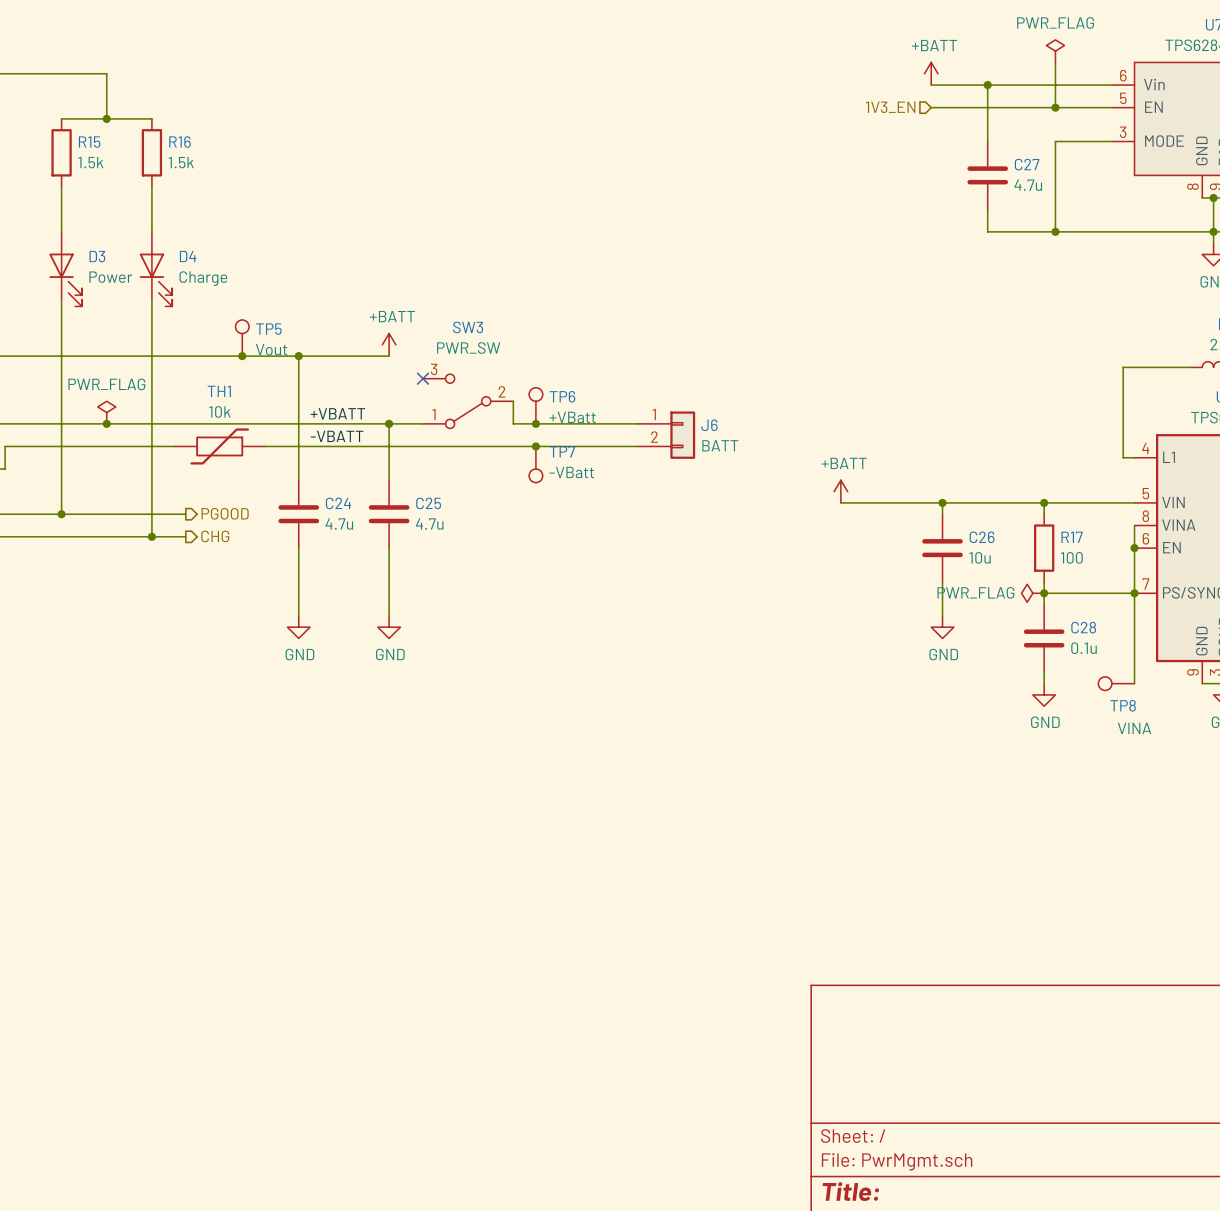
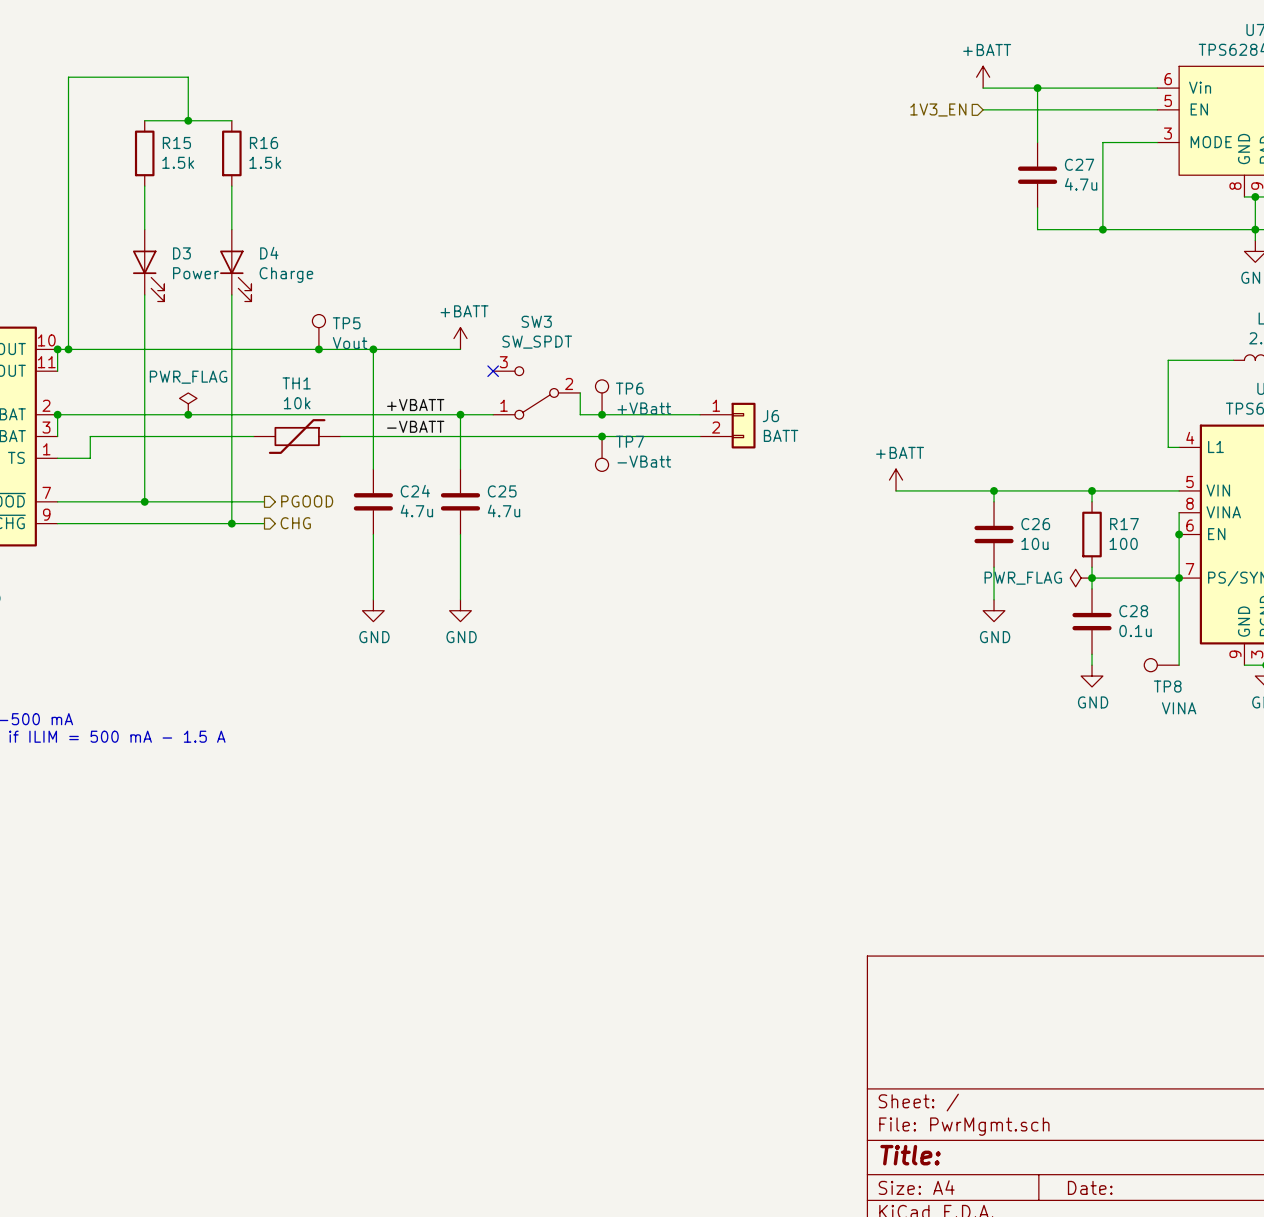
power symbol: PWR_FLAG (1055, 51) -> none
wire: (1055, 62) (1055, 107) -> none
junction: (1055, 107) -> none
SW3 value: PWR_SW (468, 348) -> SW_SPDT (537, 342)

